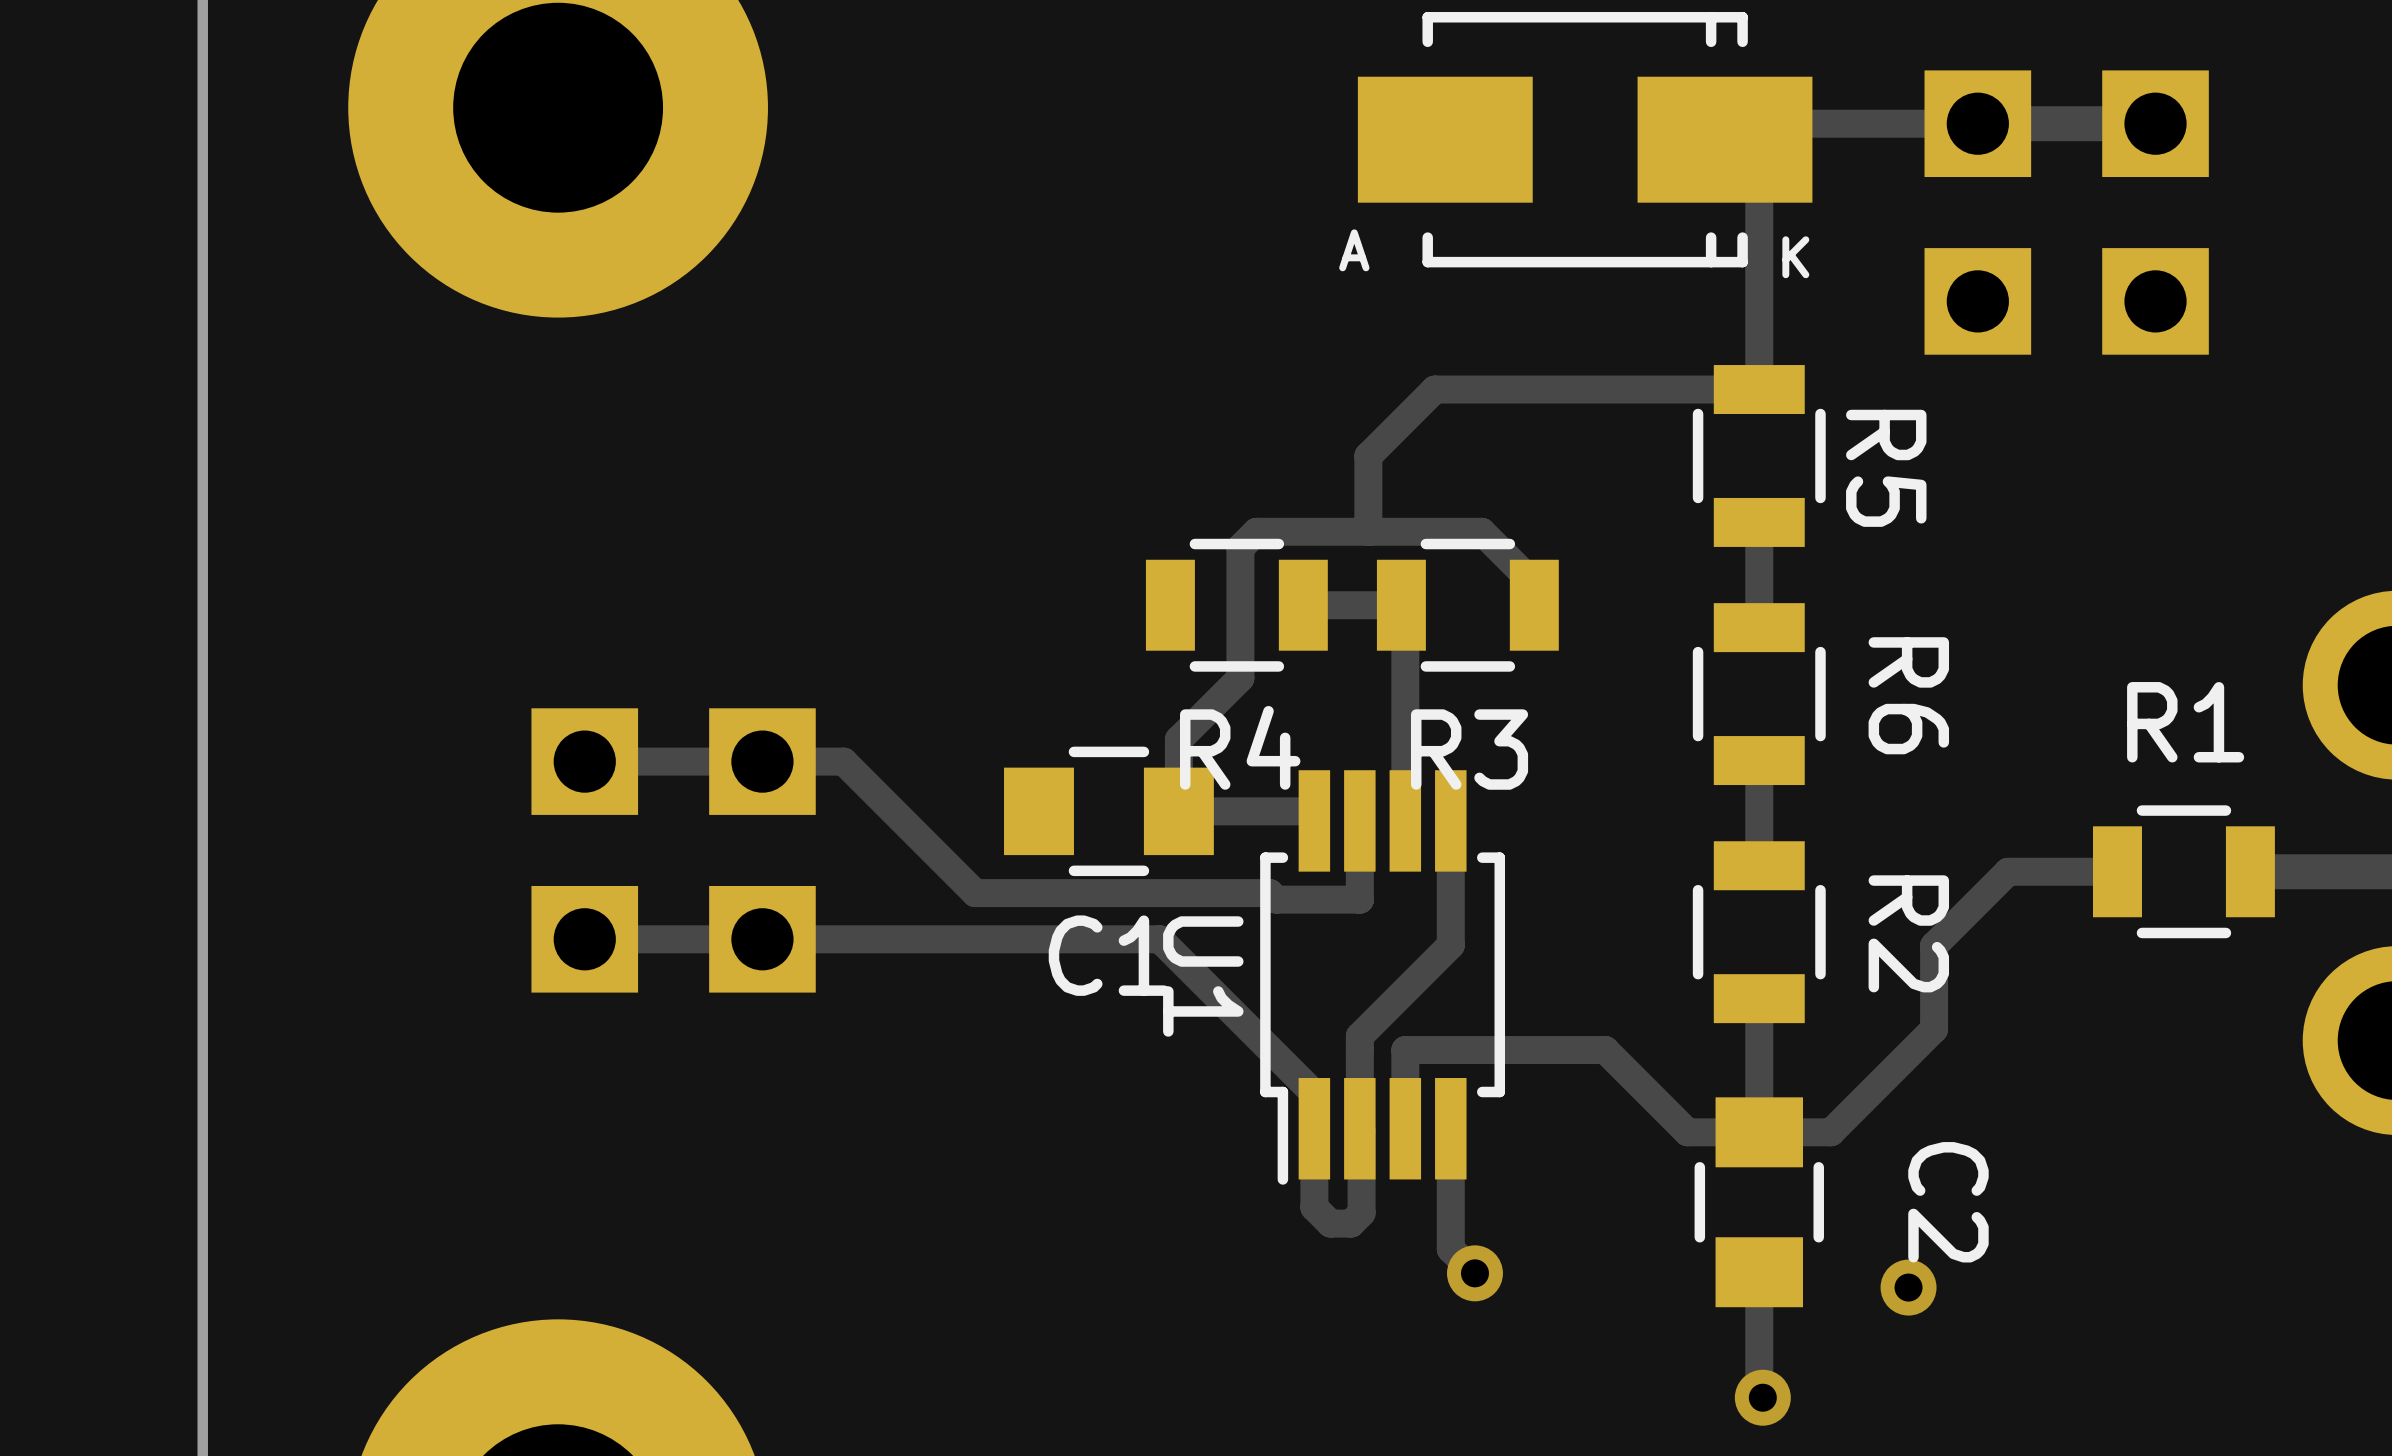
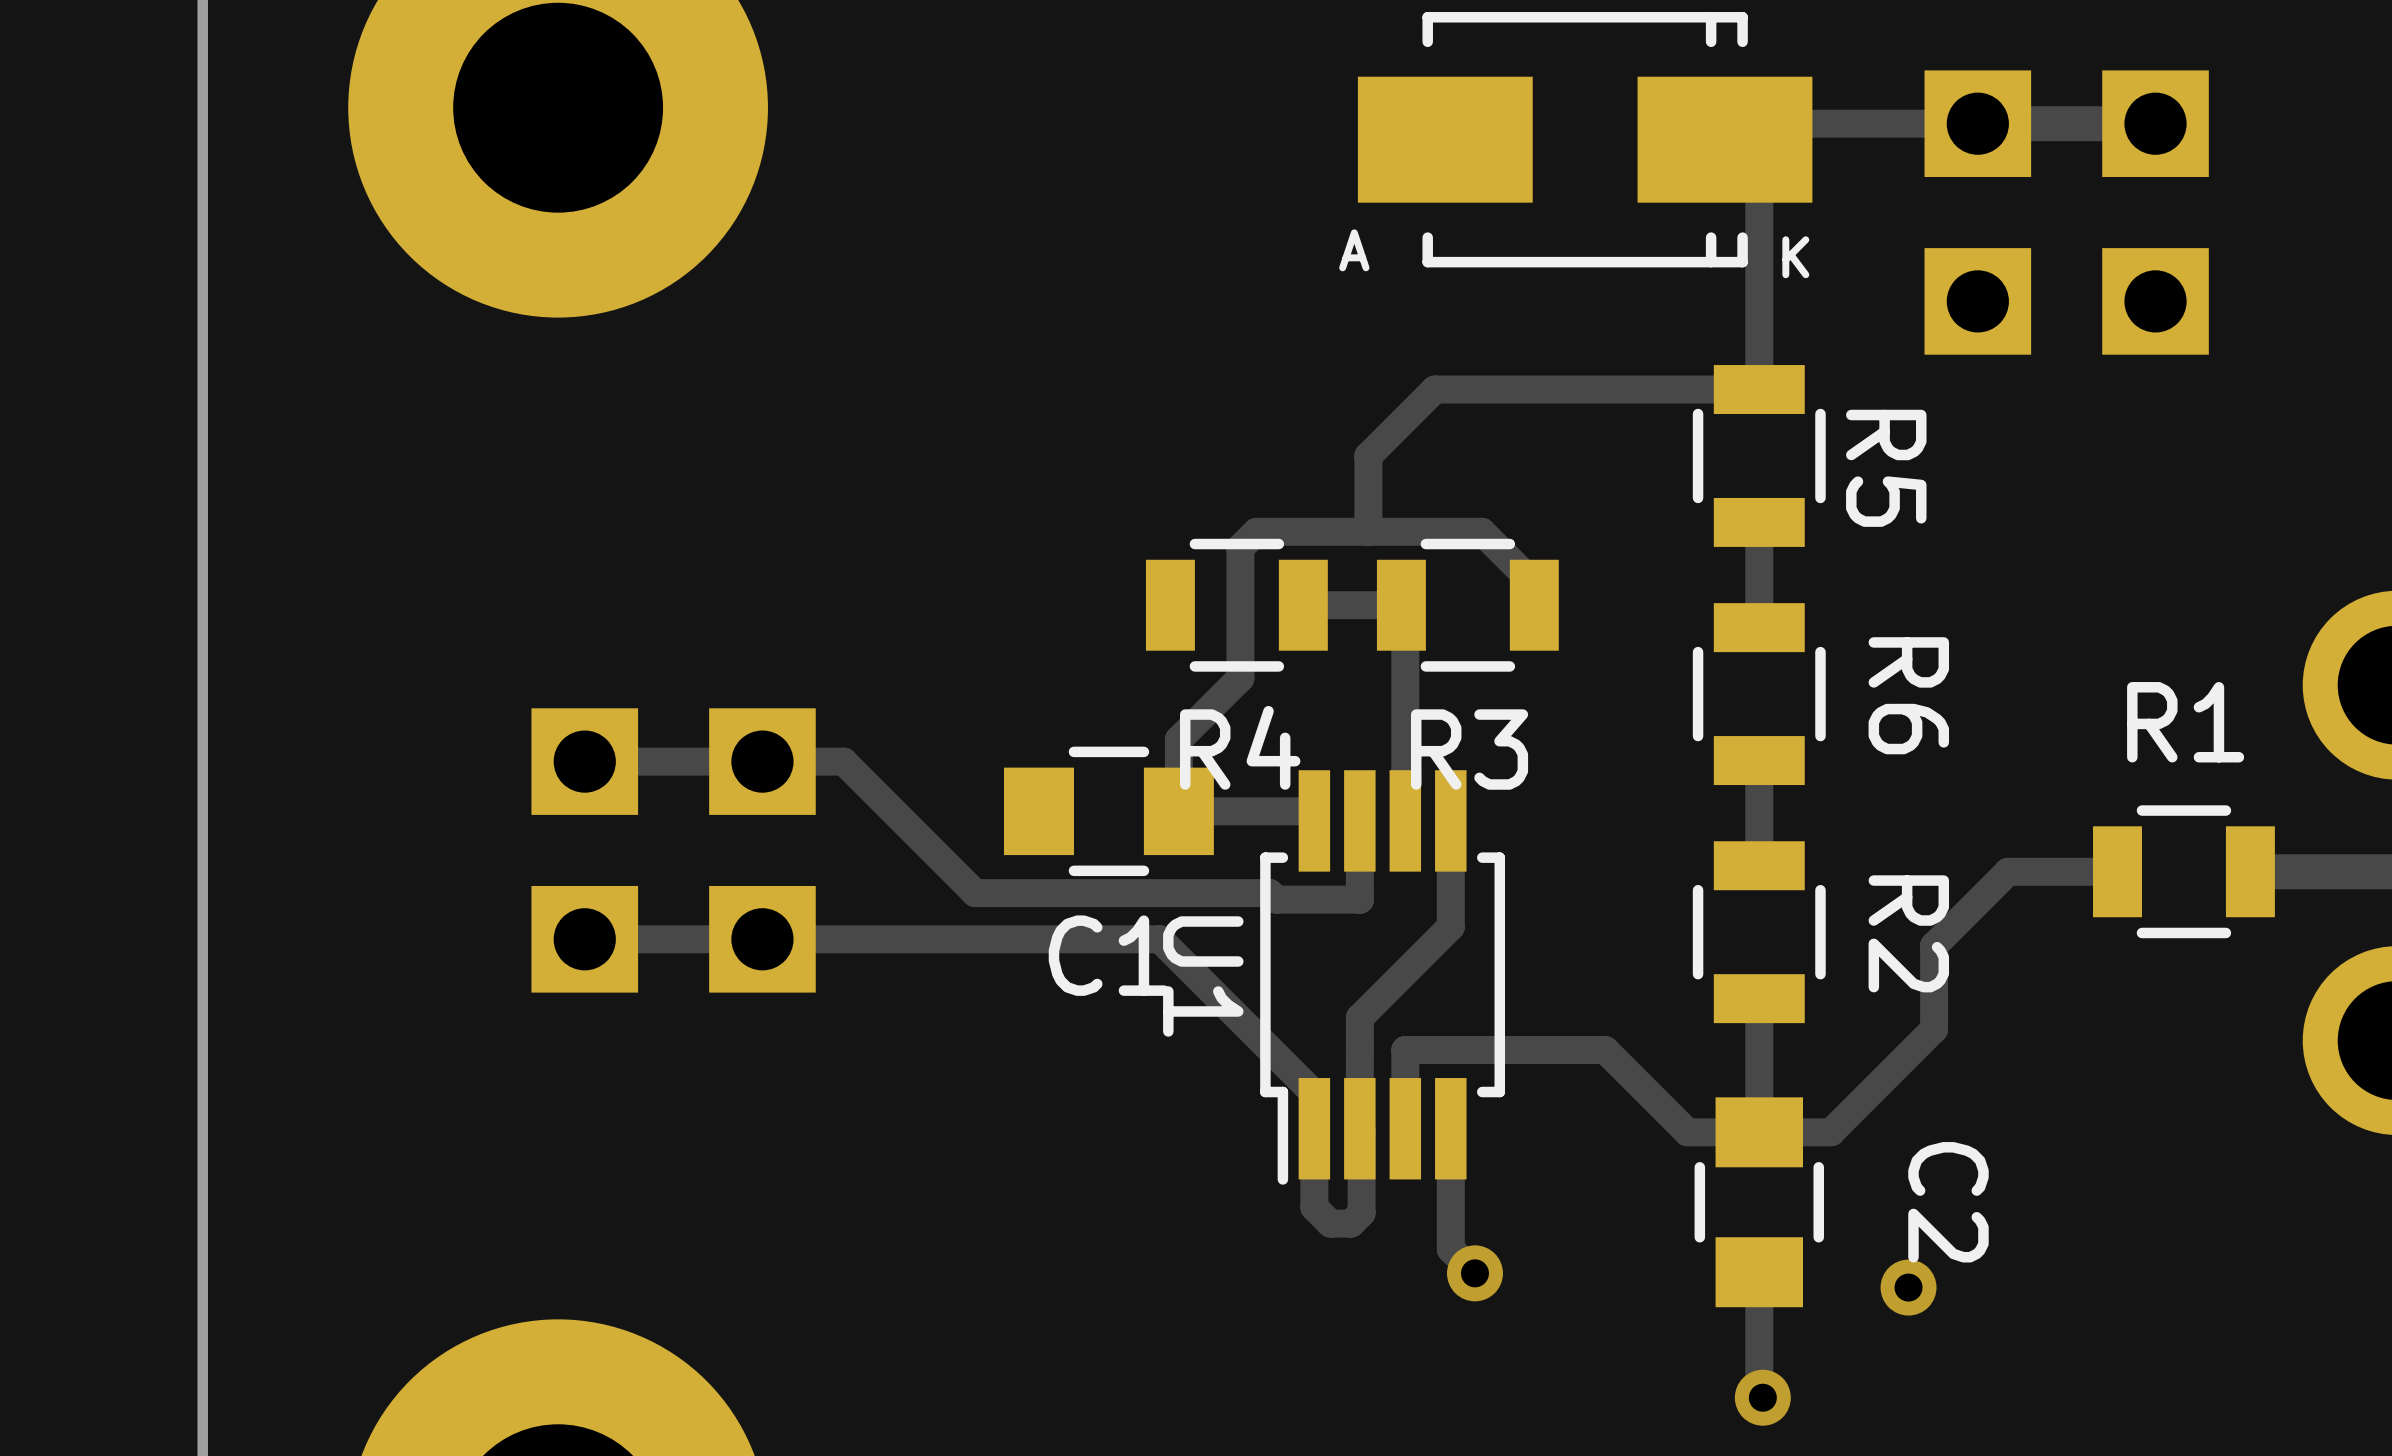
track: (1450, 926) (1450, 945) (1359, 1036) -> (1450, 926) (1359, 1017) (1359, 1036)

